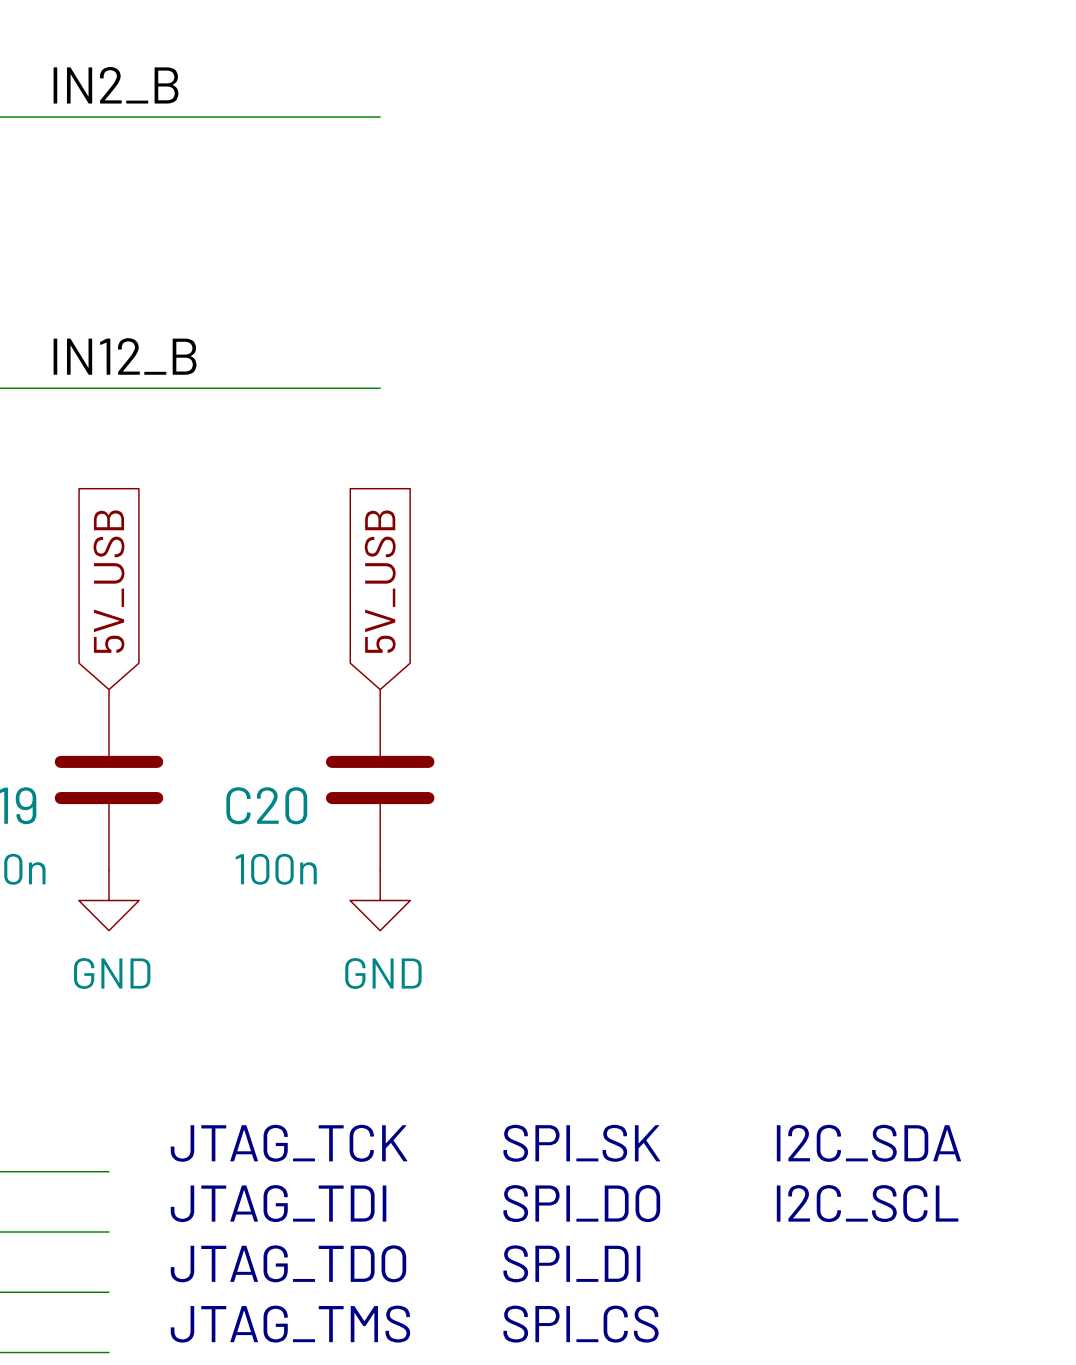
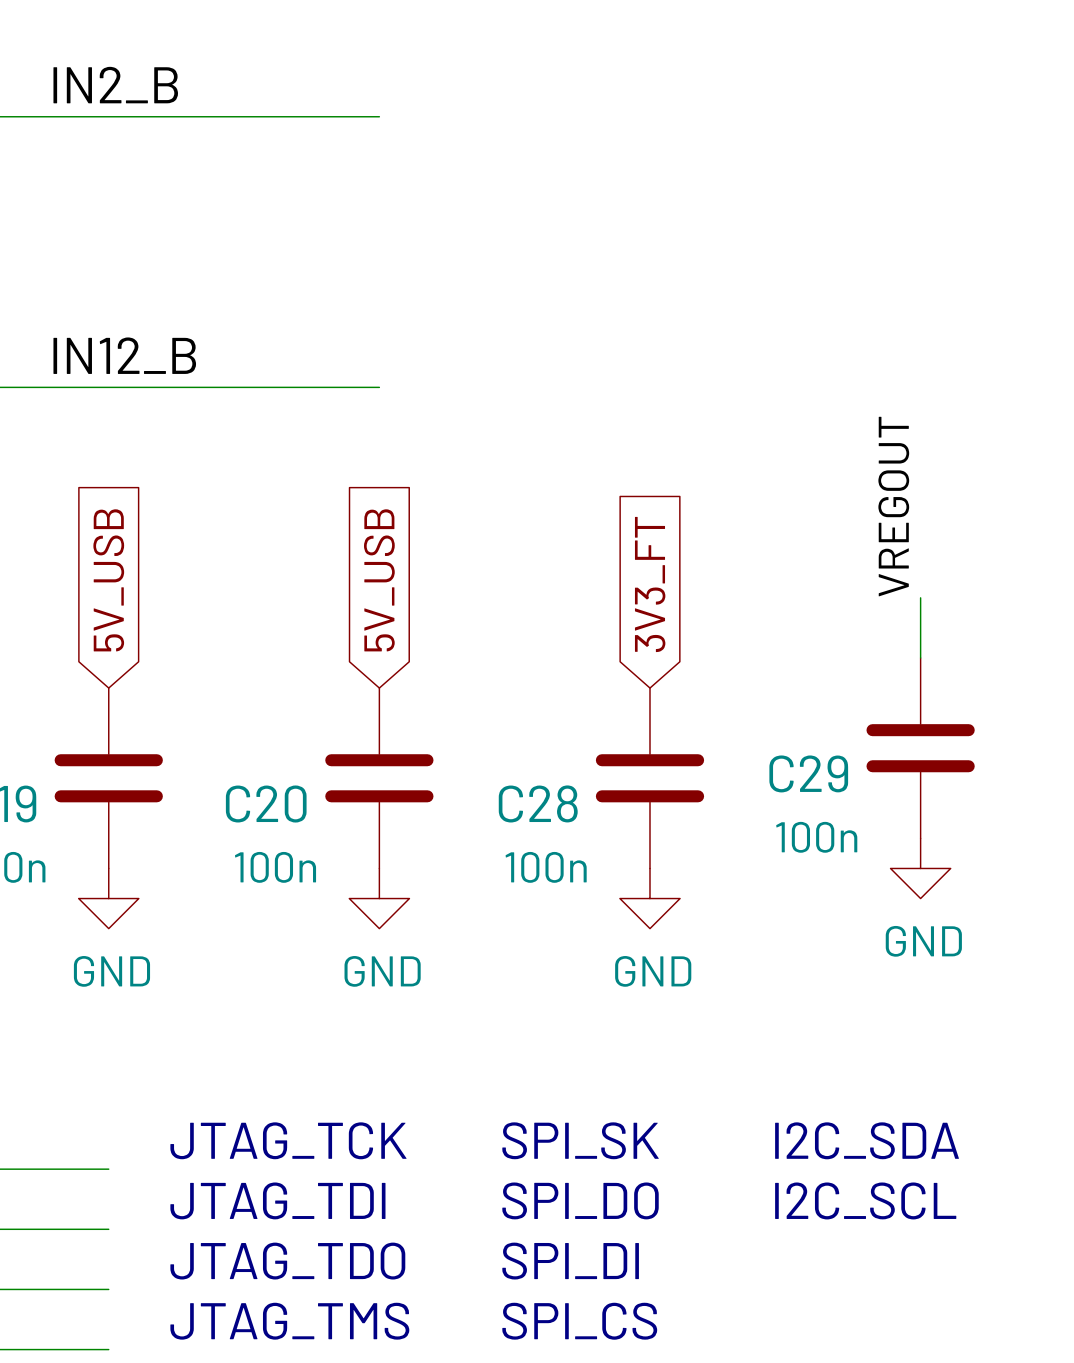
label: none -> VREGOUT (893, 506)
global label: none -> 3V3_FT (650, 584)
wire: none -> (920, 597) (920, 657)
C29: none -> (920, 748)
C28: none -> (649, 778)
power symbol: none -> GND (920, 868)
power symbol: none -> GND (649, 898)

